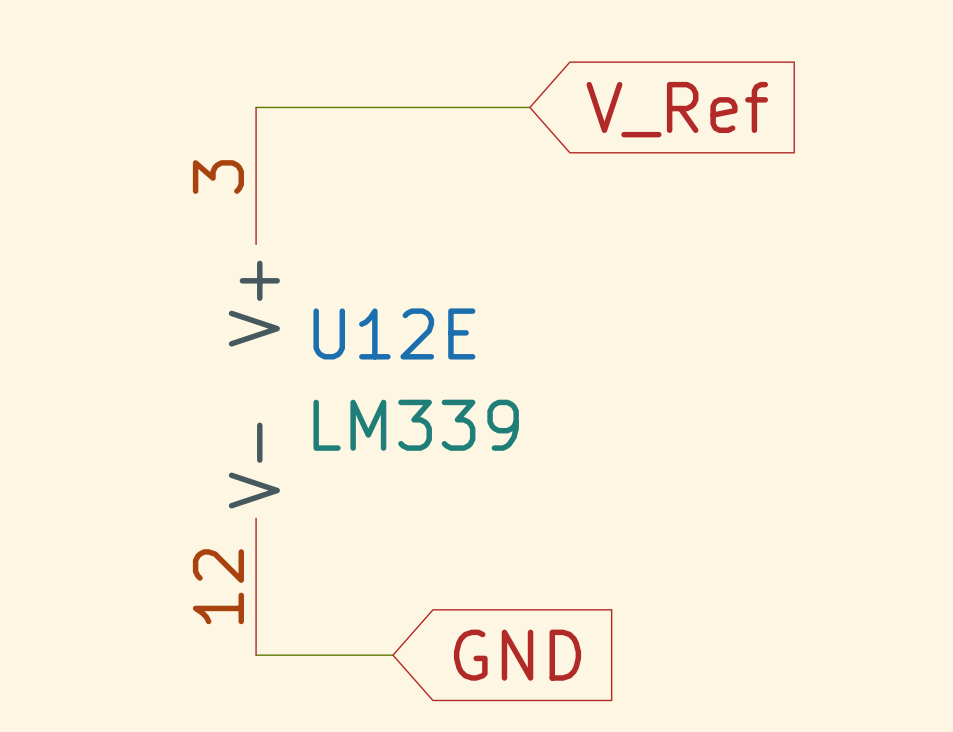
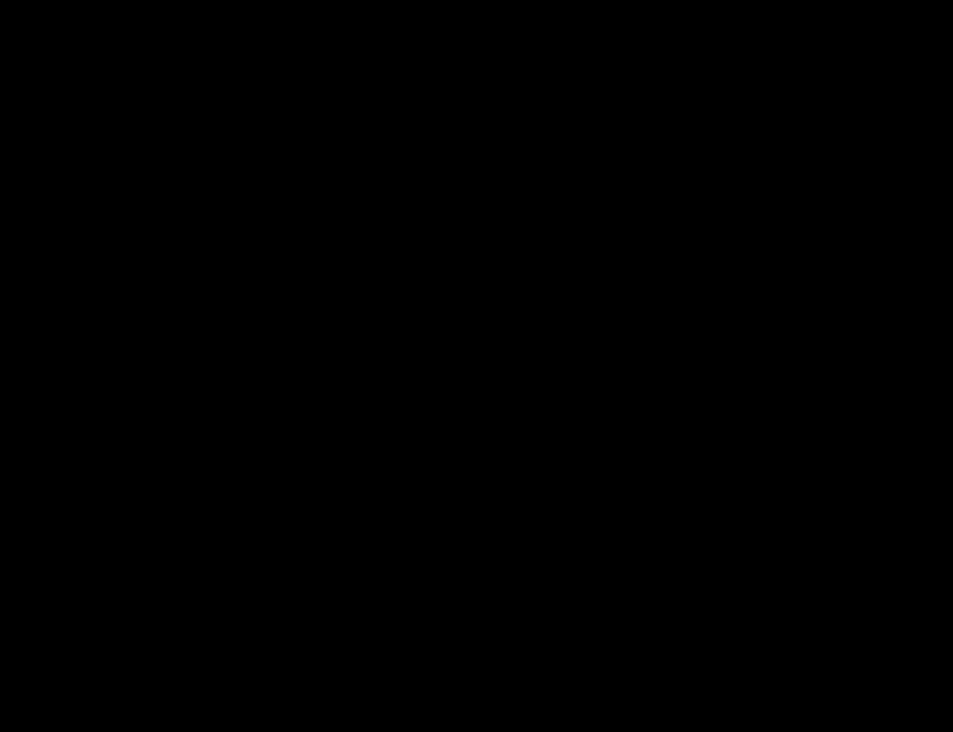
wire: (256, 107) (529, 107) -> none
global label: V_Ref (677, 109) -> none
U12E: LM339 (256, 381) -> none
wire: (256, 655) (393, 655) -> none
global label: GND (517, 655) -> none

